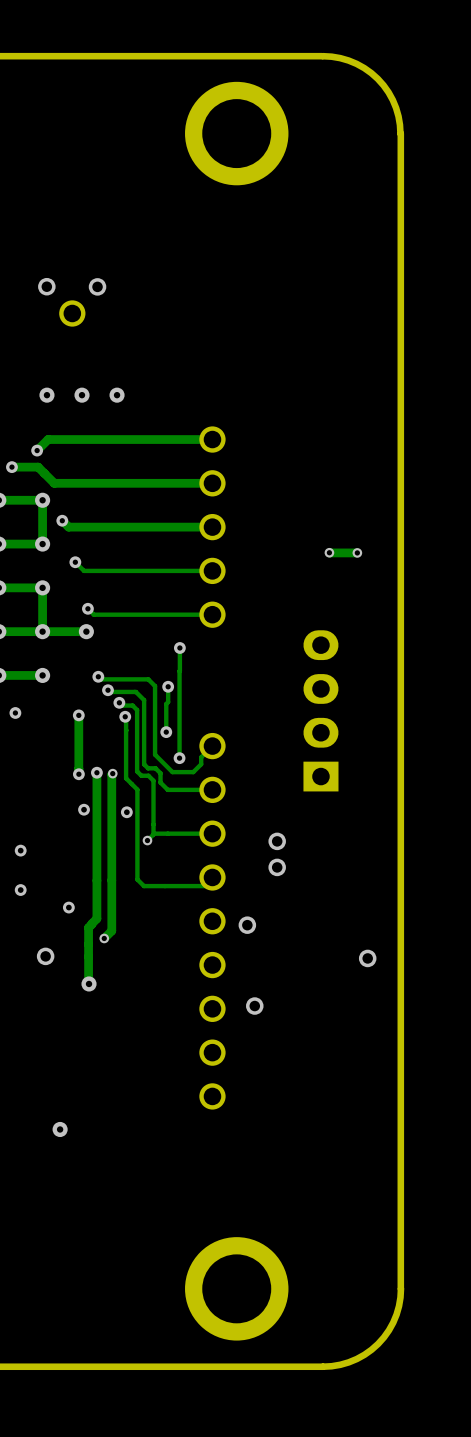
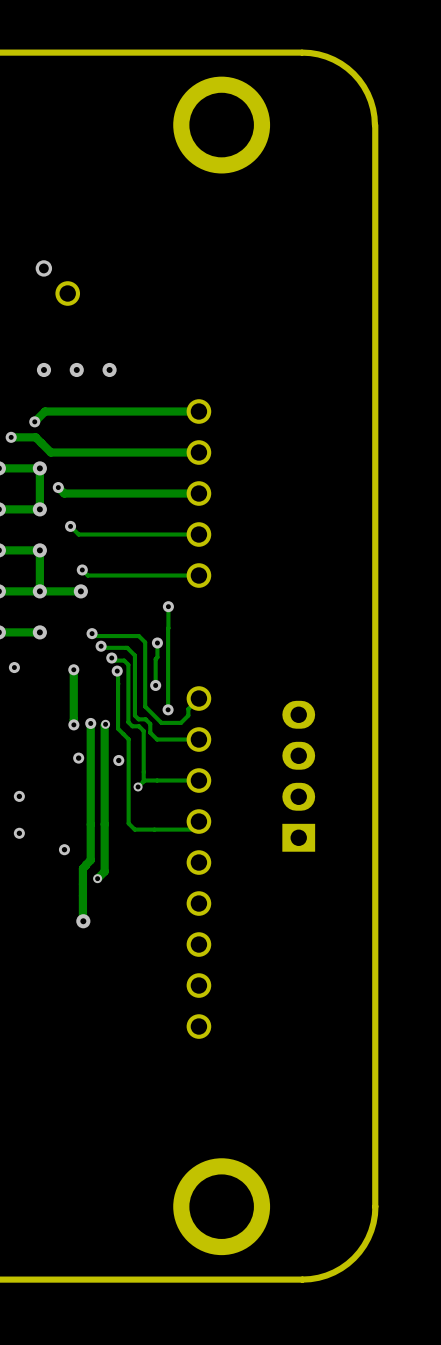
via: (97, 286) -> none
via: (329, 552) -> none
track: (357, 552) (329, 552) -> none
via: (357, 552) -> none
part position: (320, 710) -> (298, 776)
via: (277, 841) -> none
via: (277, 867) -> none
via: (247, 925) -> none
via: (45, 956) -> none
via: (367, 958) -> none
via: (254, 1006) -> none
via: (60, 1129) -> none

